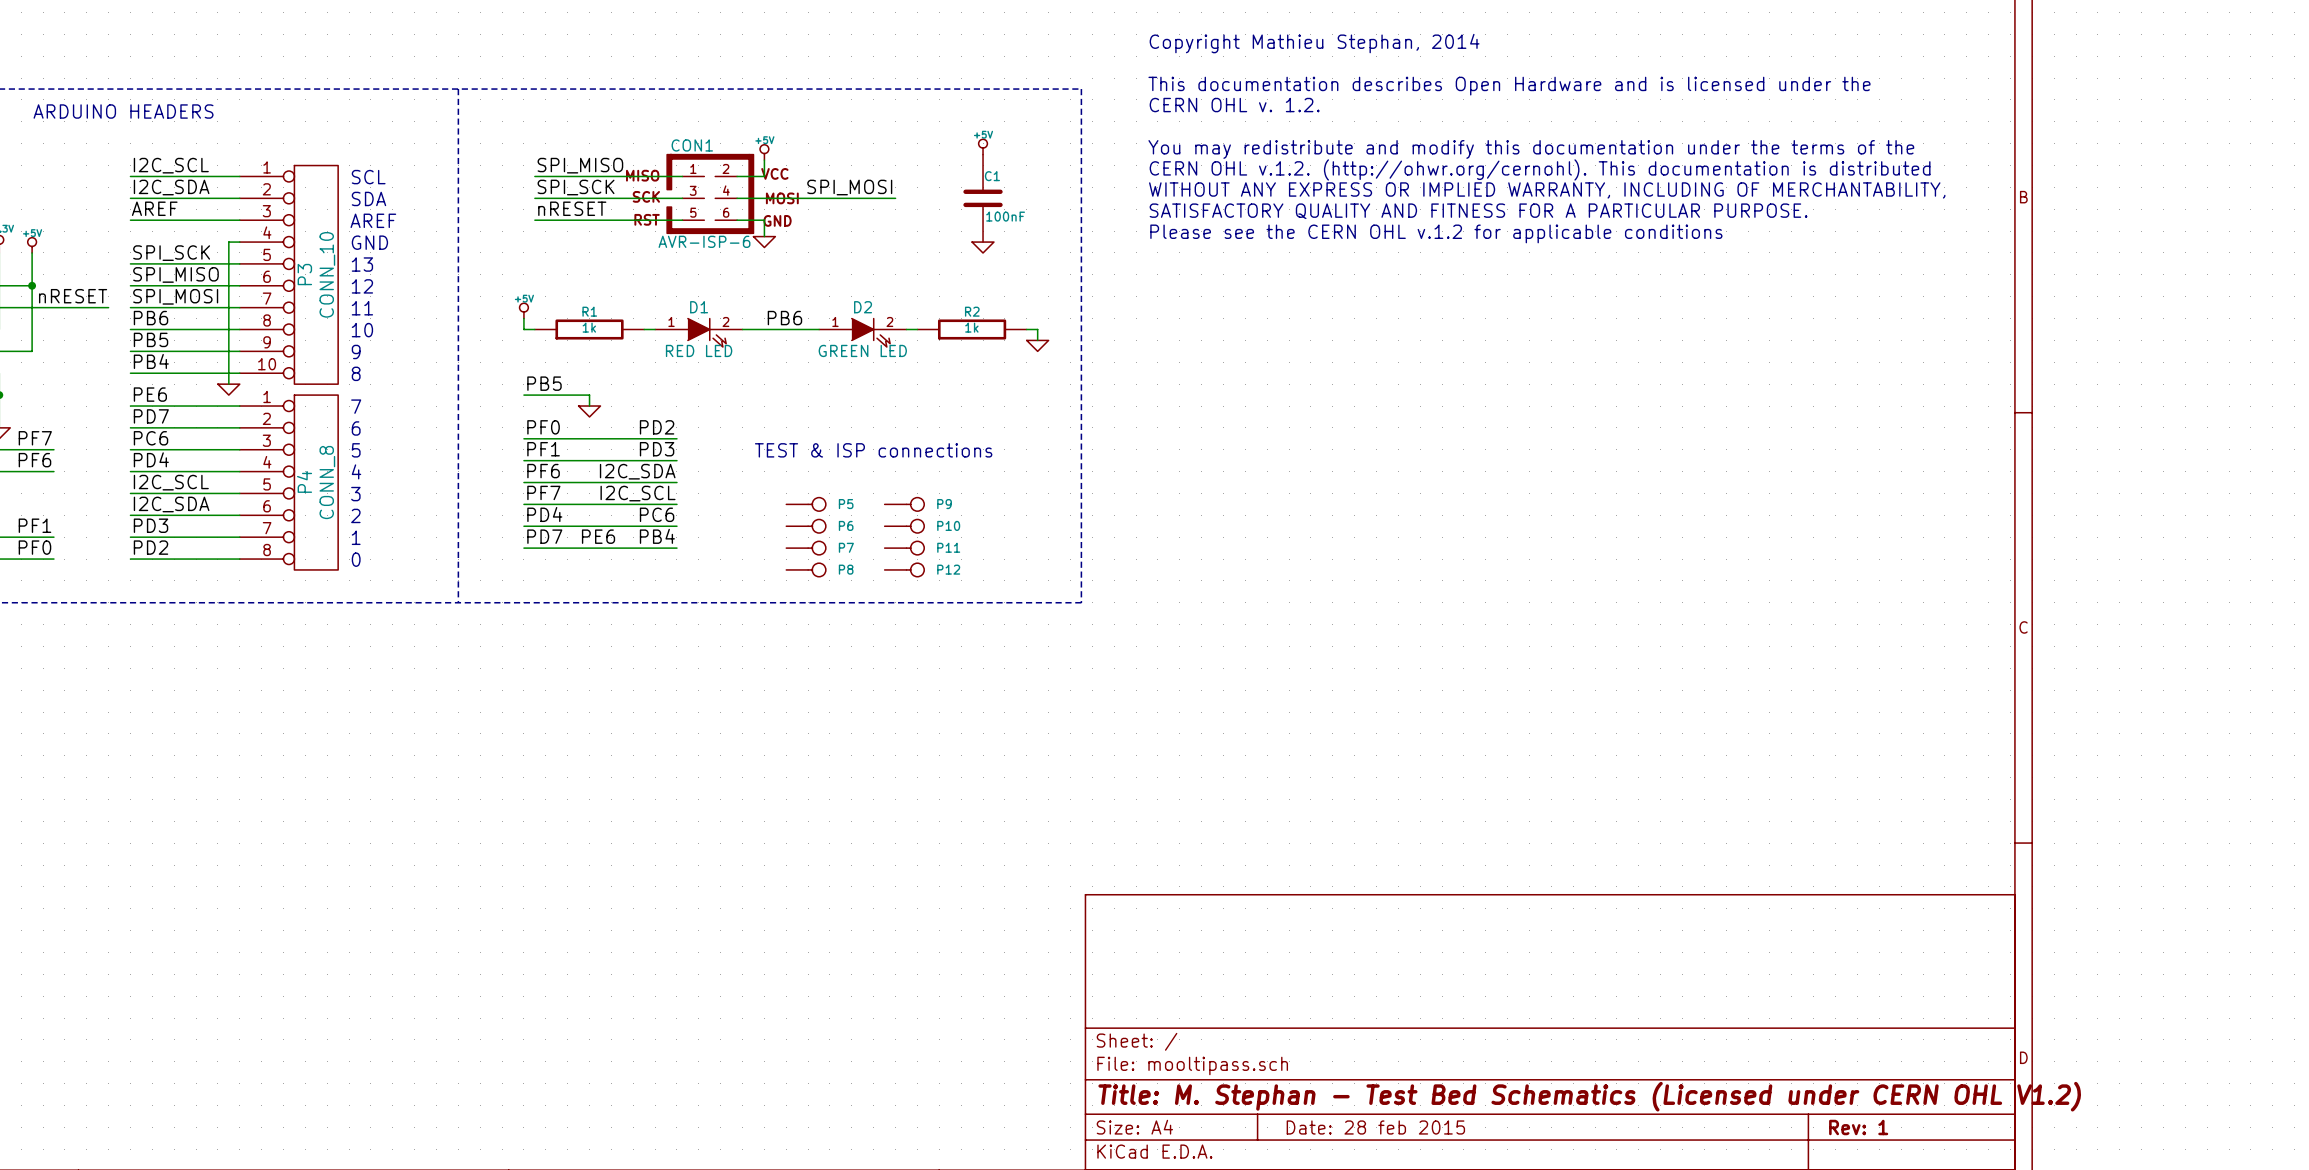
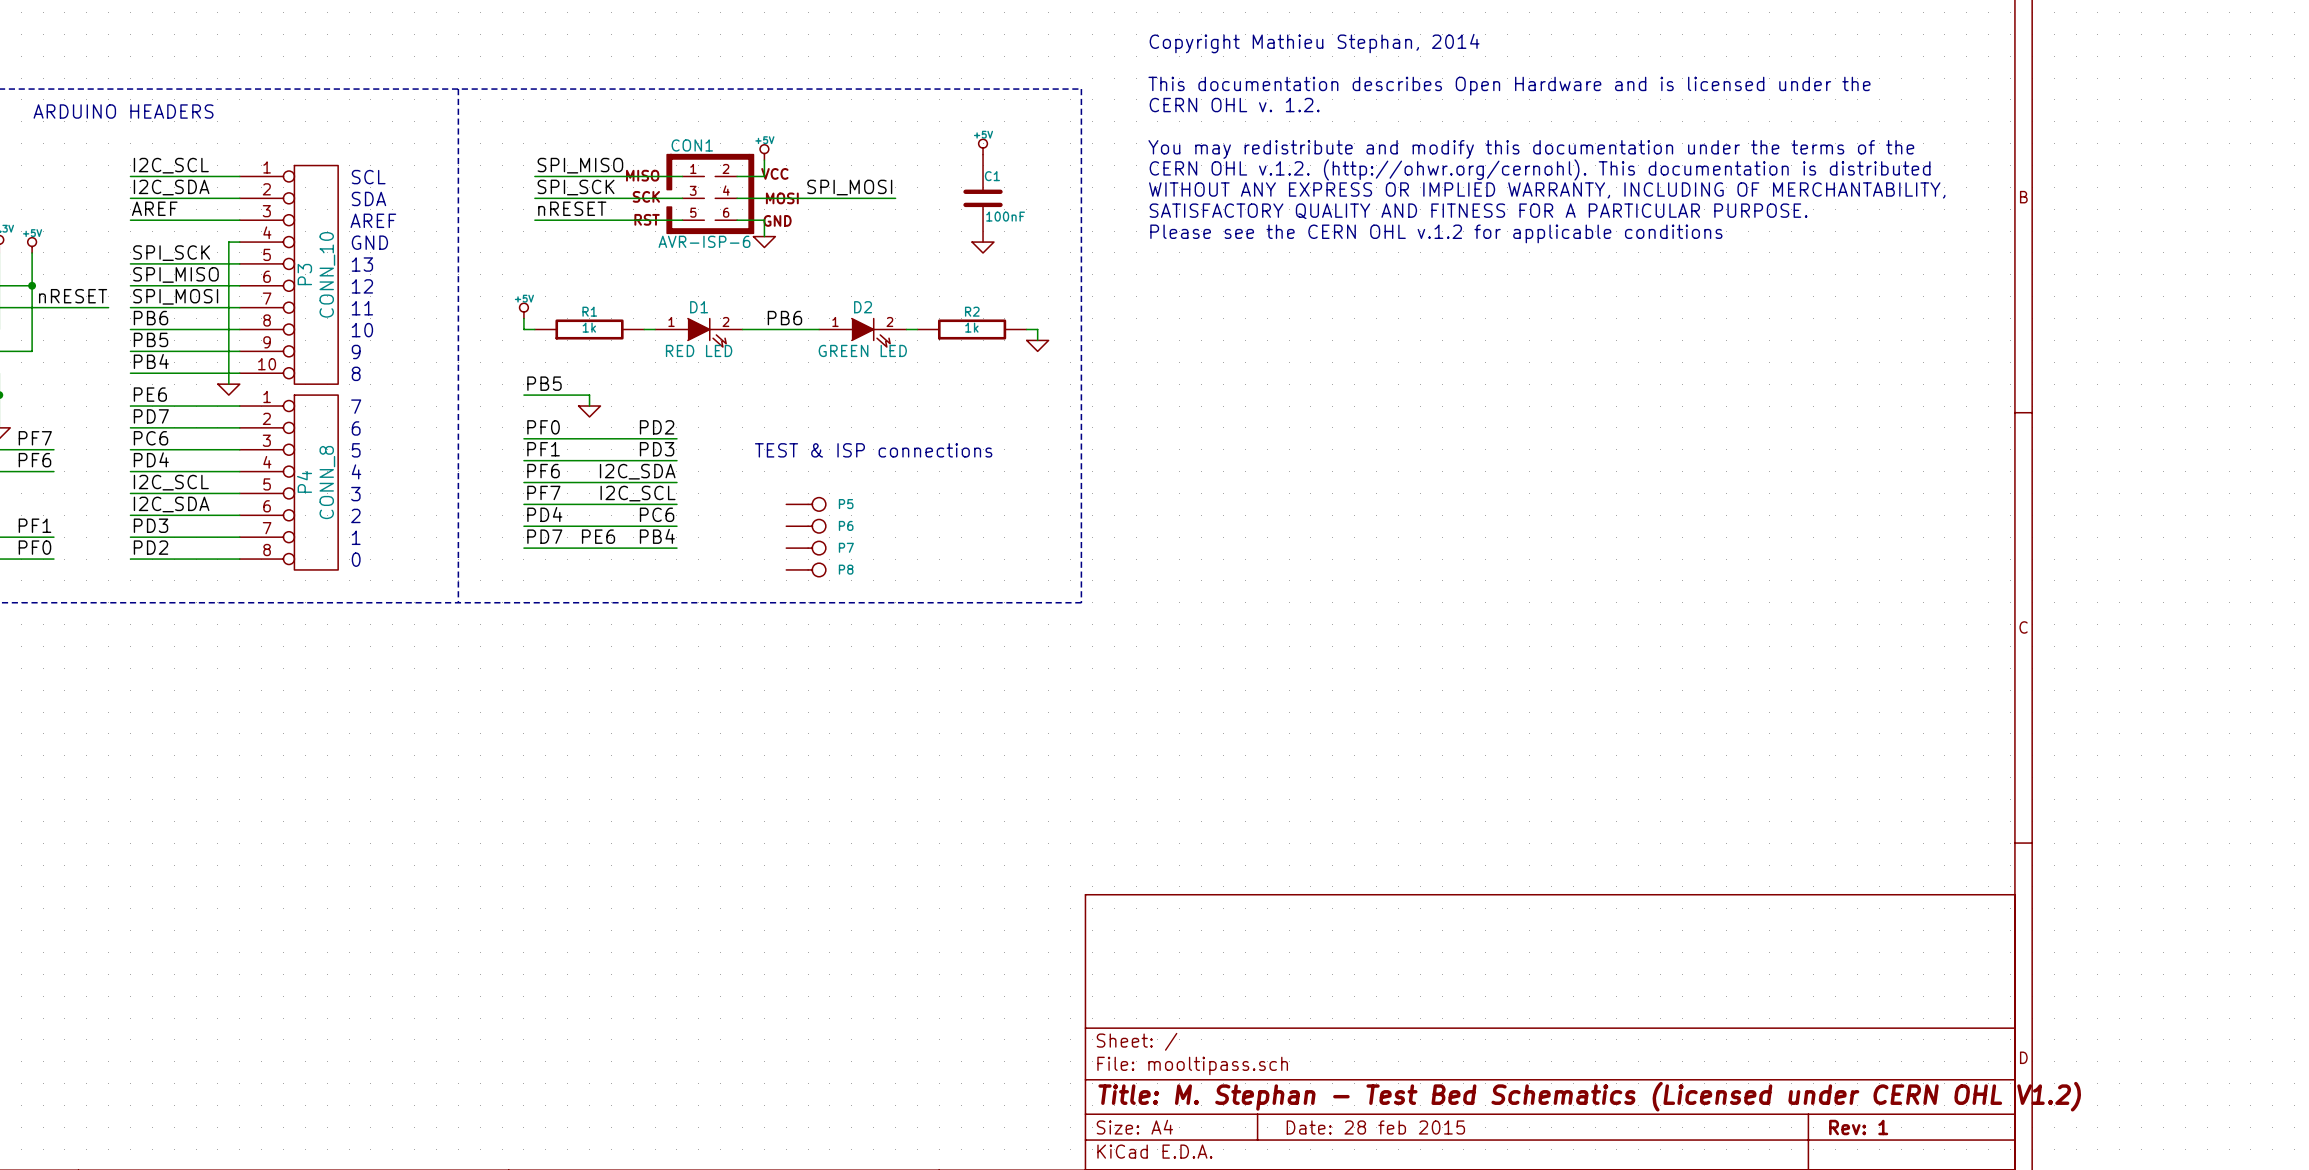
P9: (904, 504) -> none
P10: (904, 526) -> none
P11: (904, 548) -> none
P12: (904, 569) -> none

